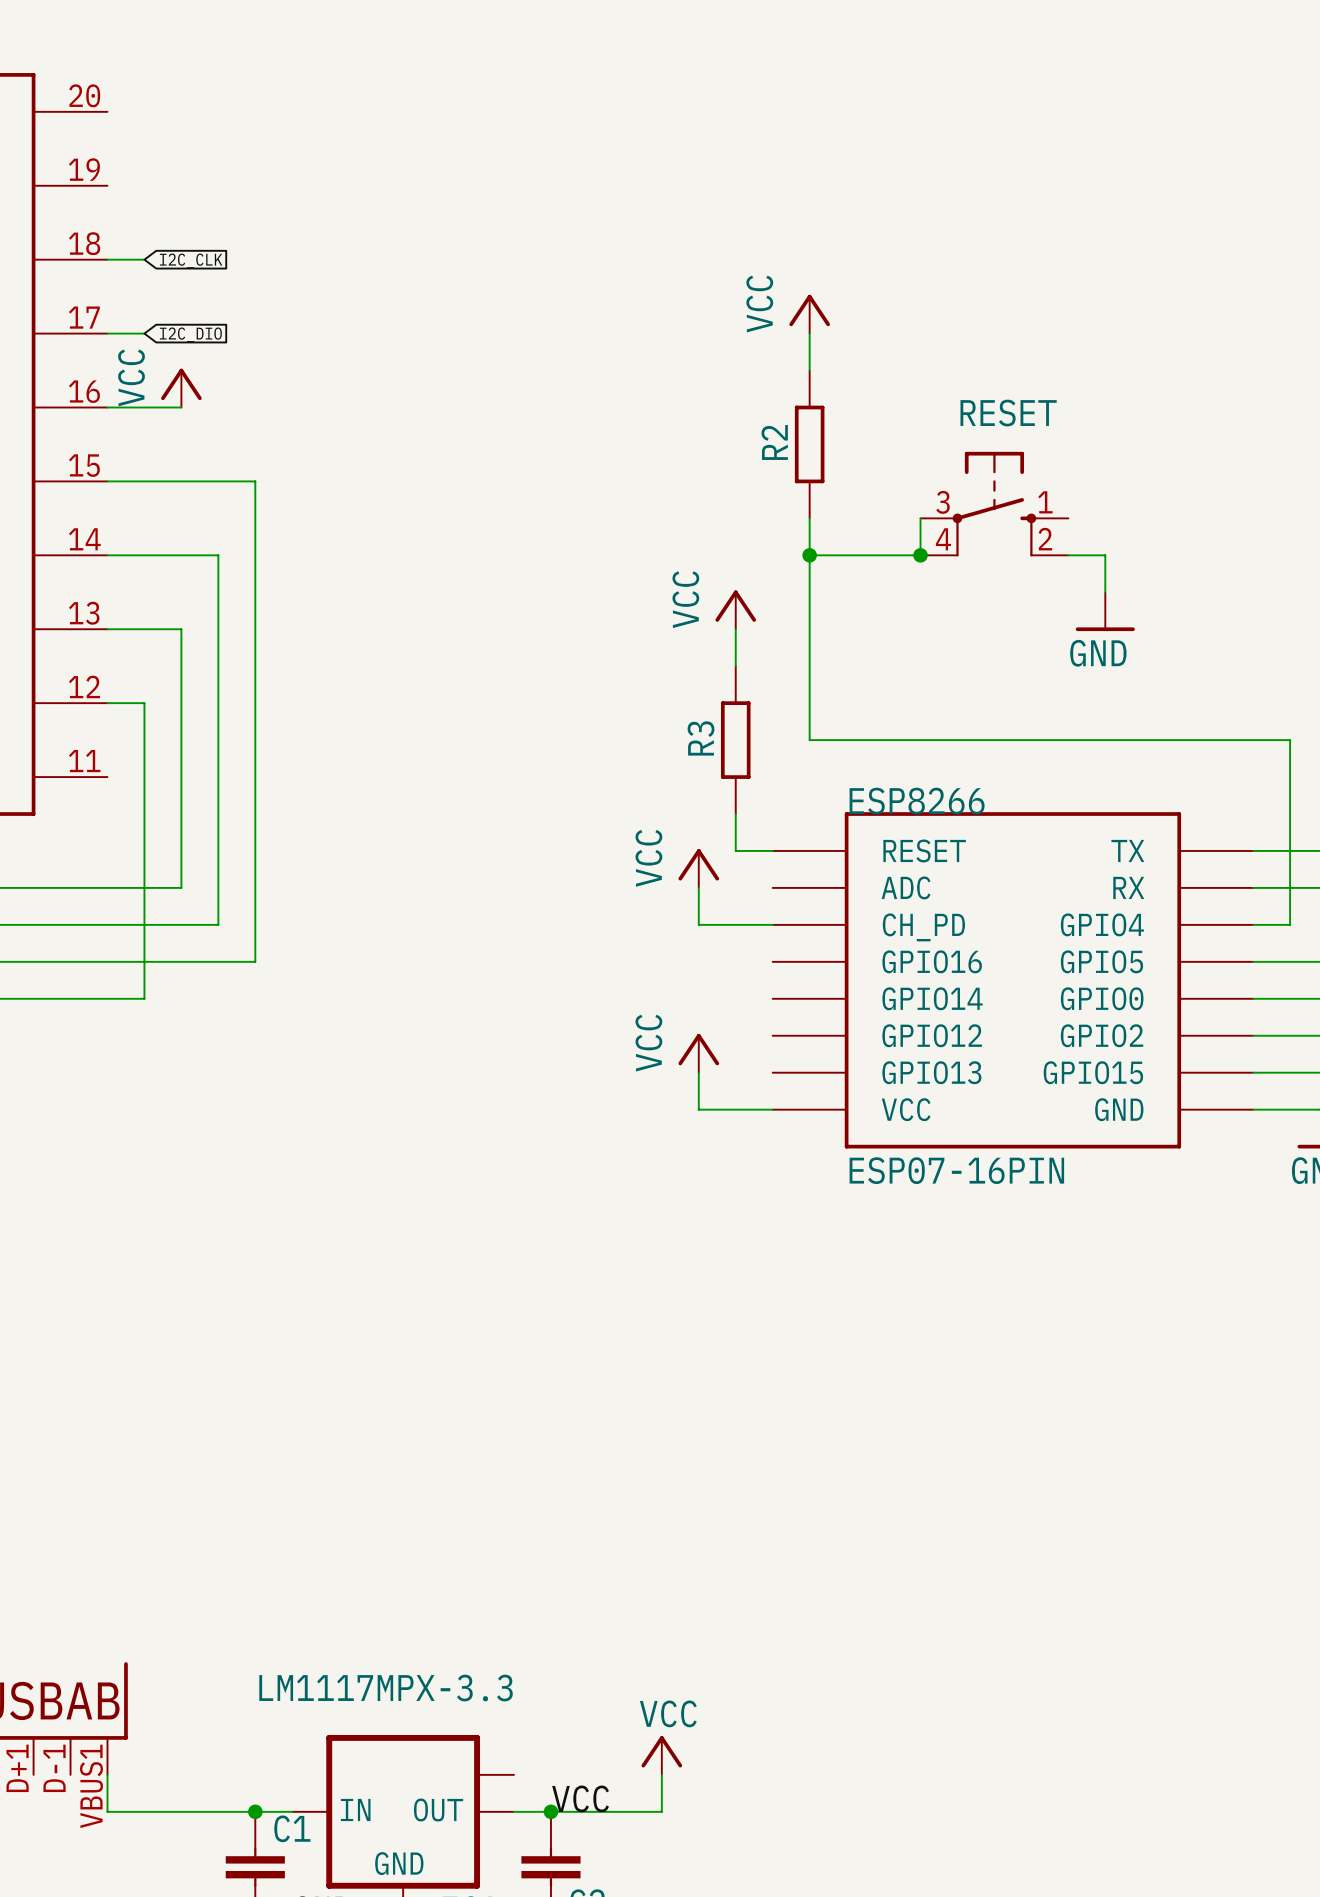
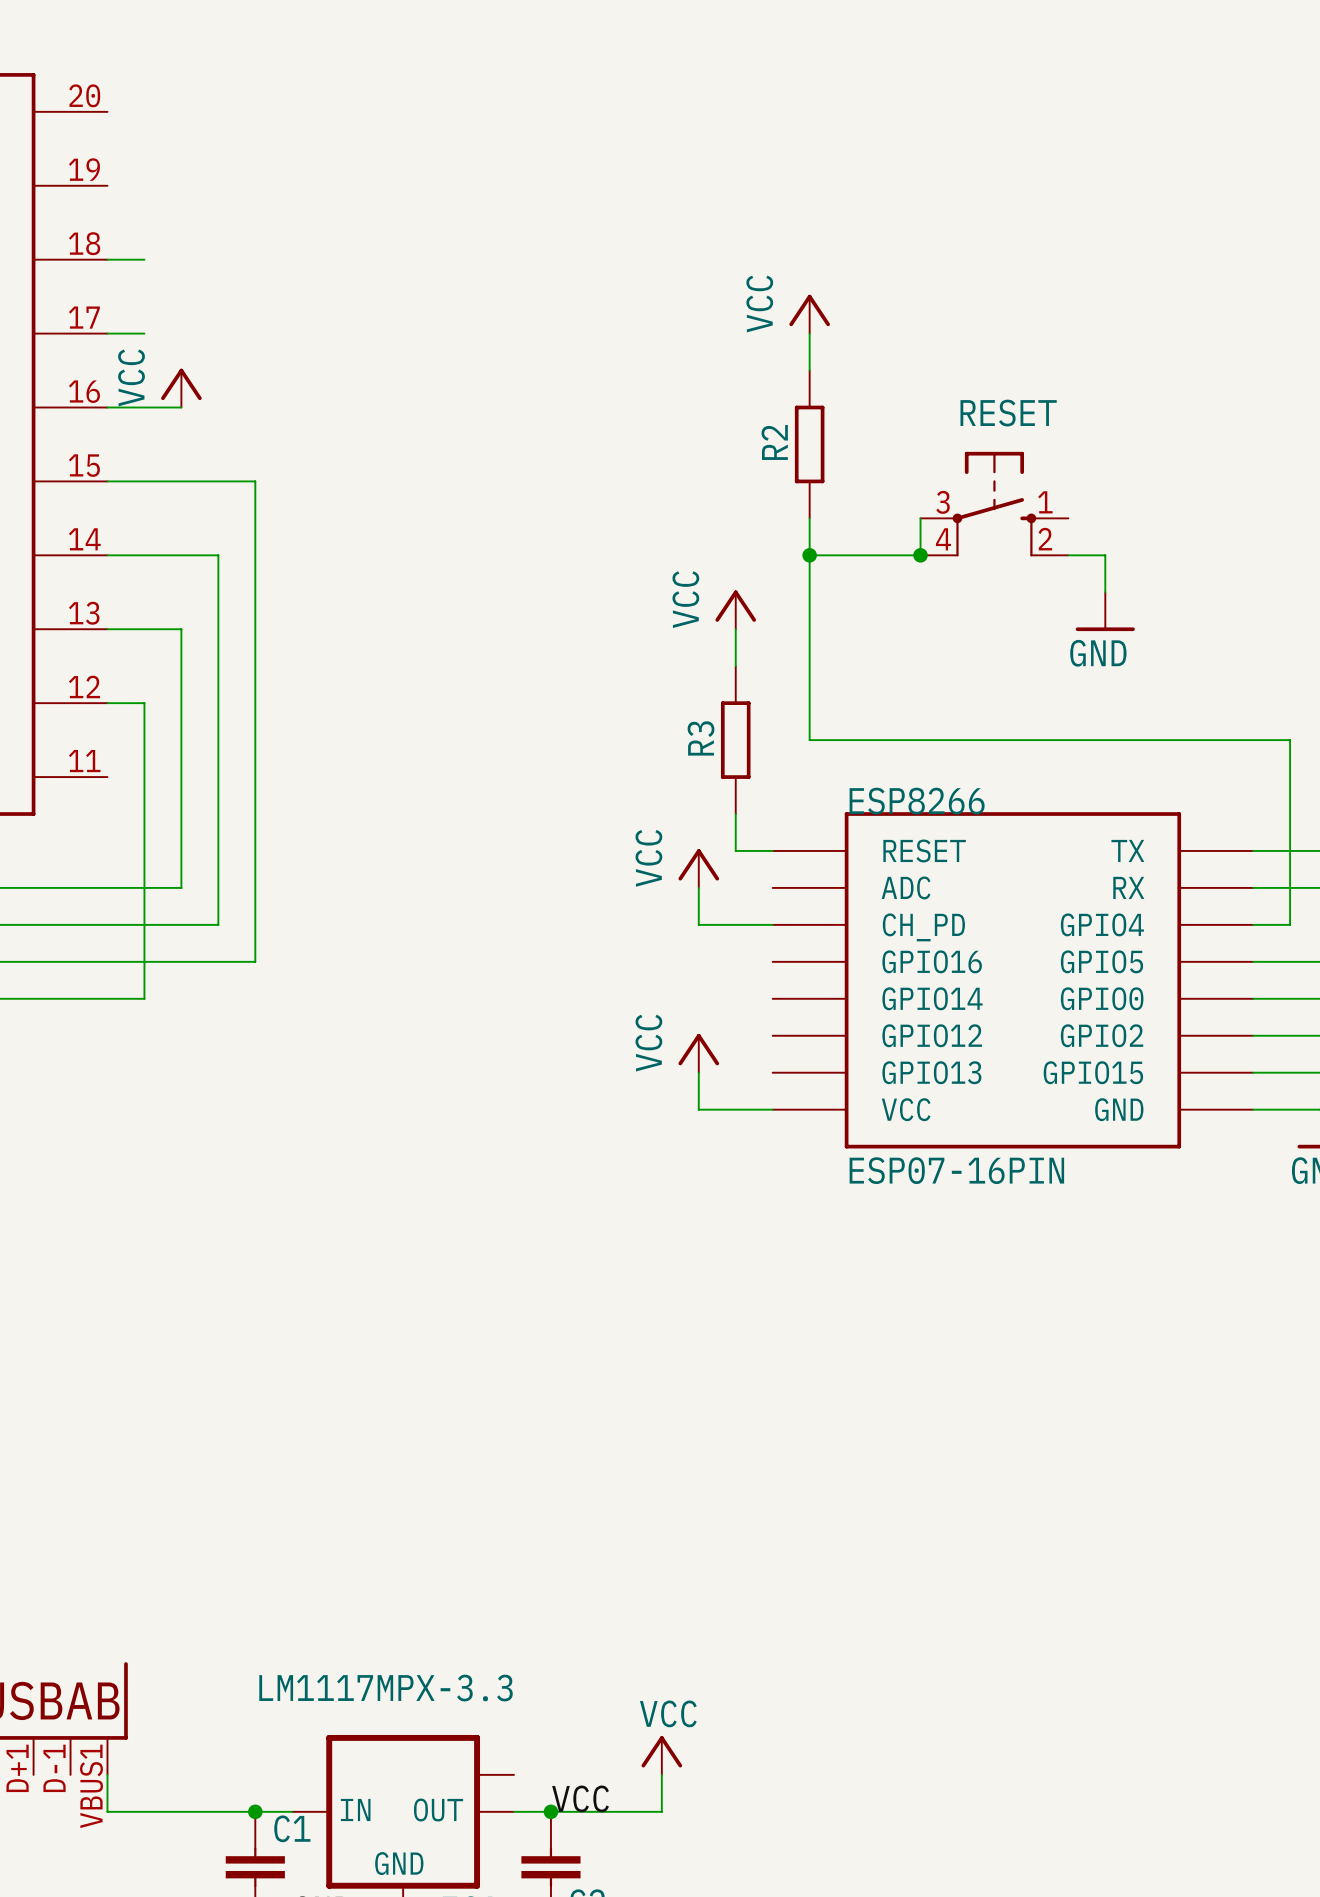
global label: I2C_CLK (191, 261) -> none
global label: I2C_DIO (190, 334) -> none

